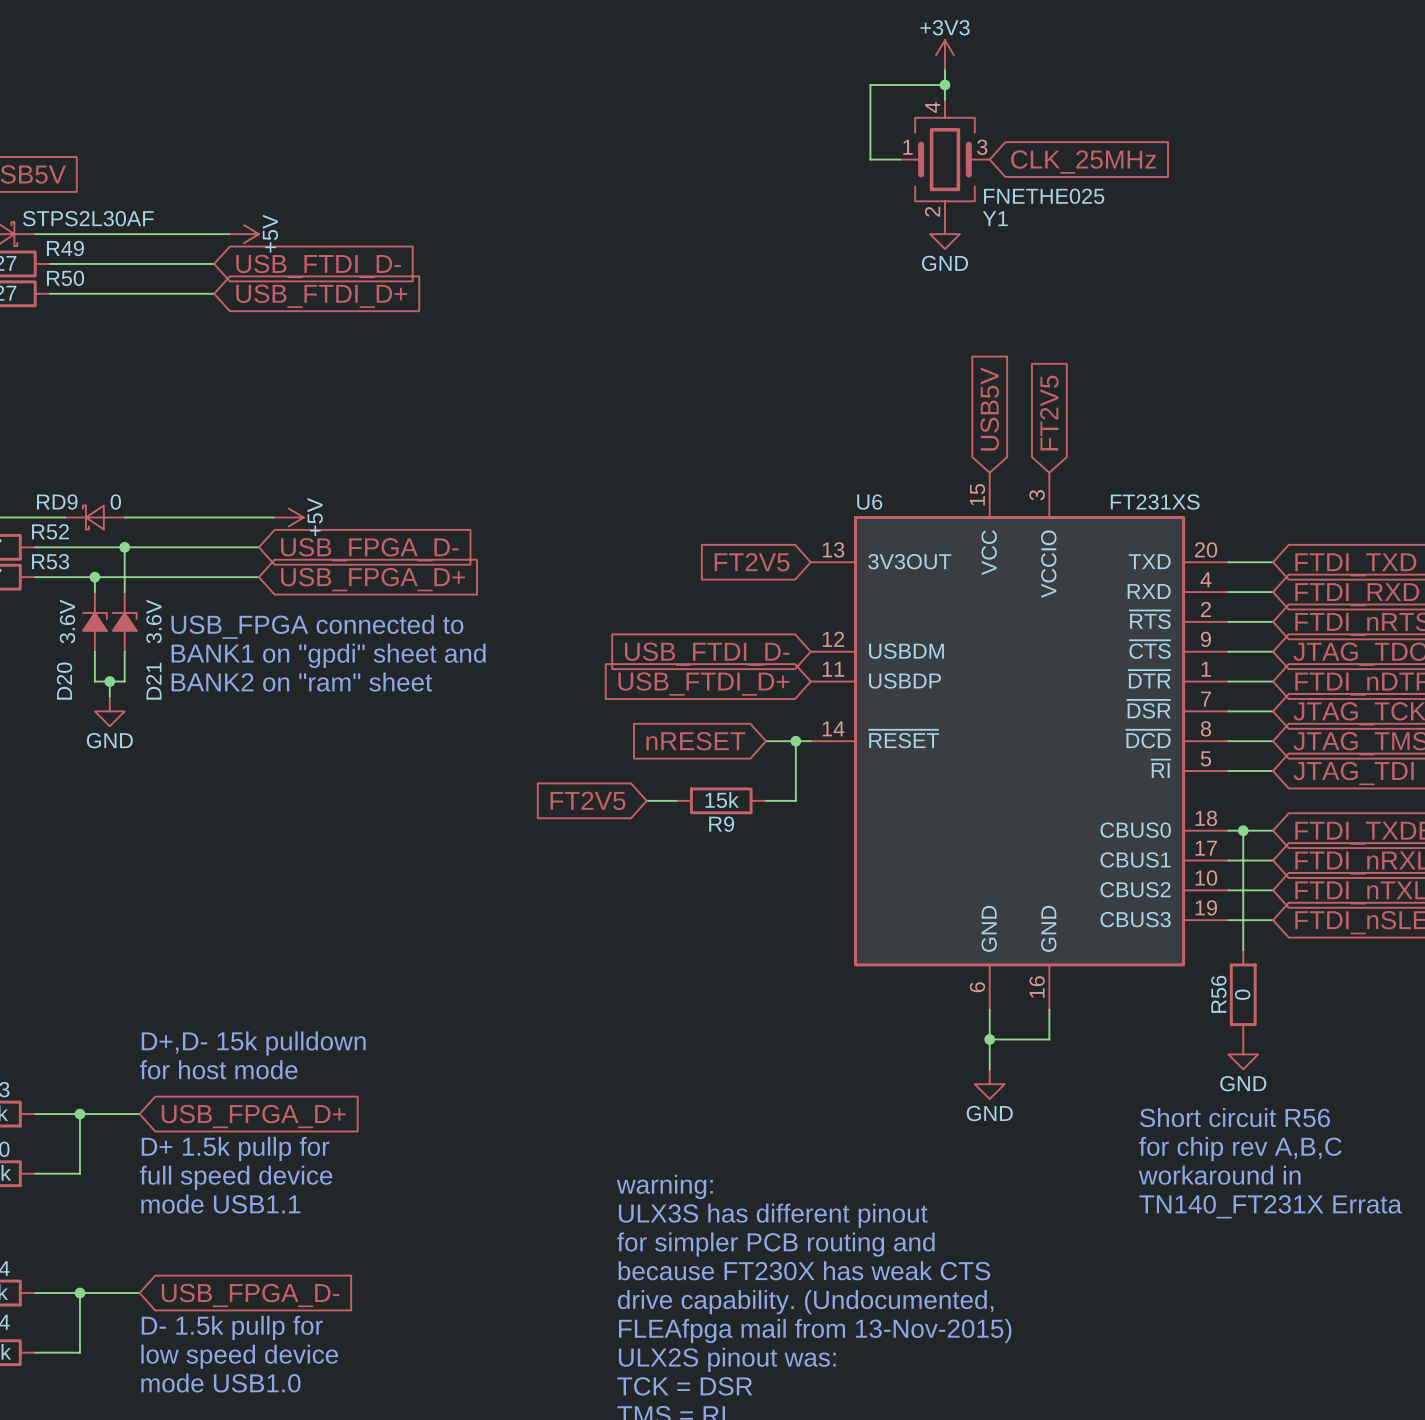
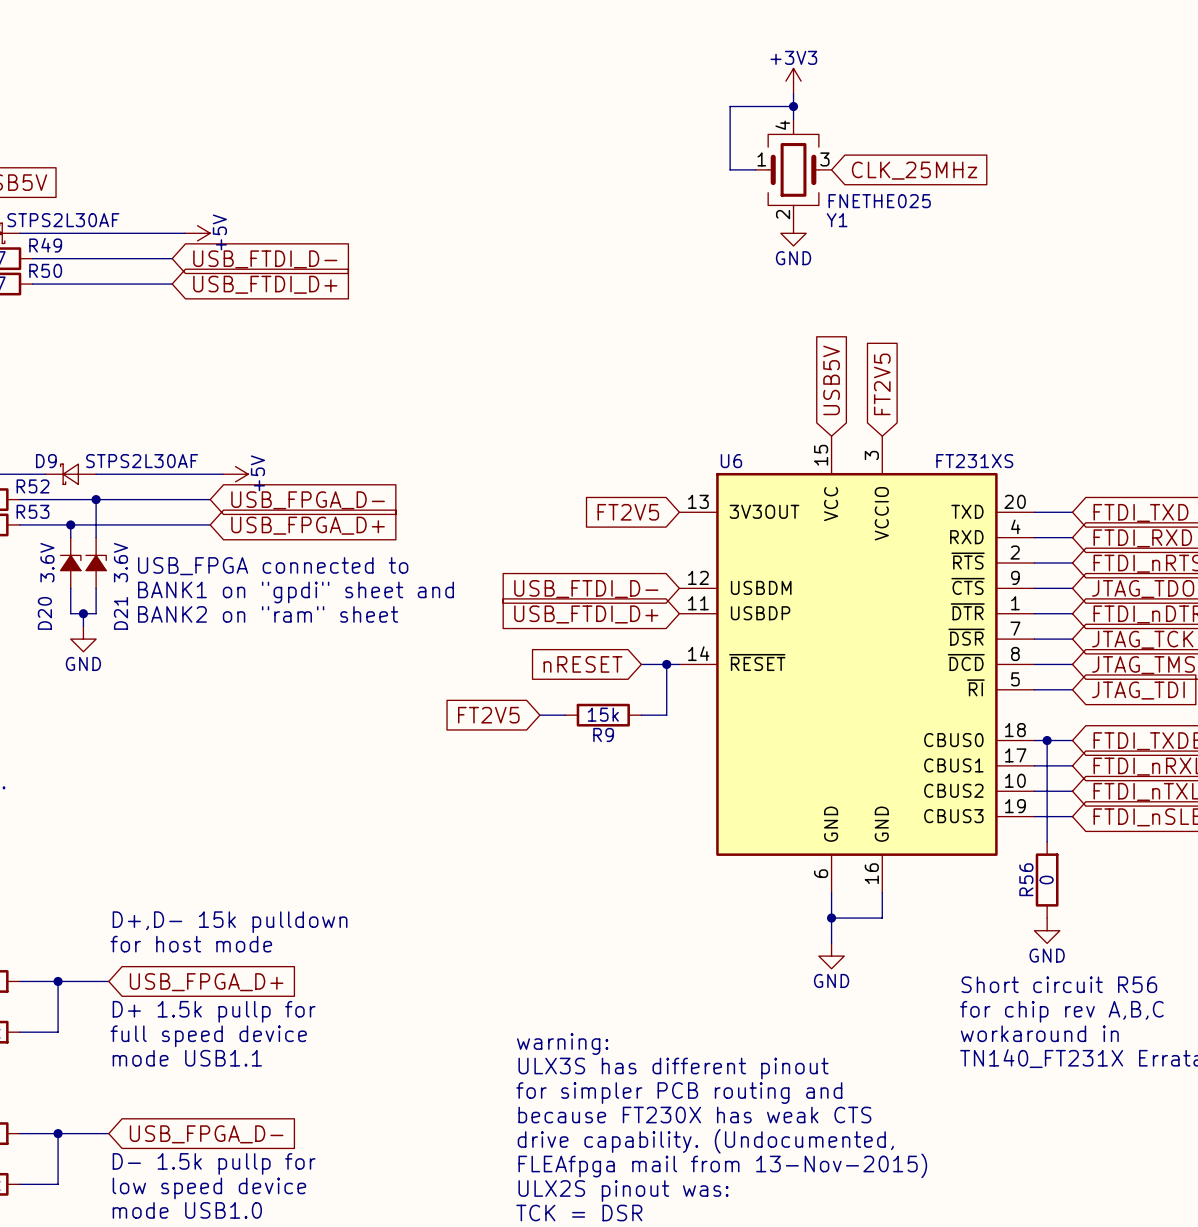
RD9 name: RD9 (57, 502) -> D9 (46, 461)
RD9 value: 0 (115, 502) -> STPS2L30AF (142, 461)

